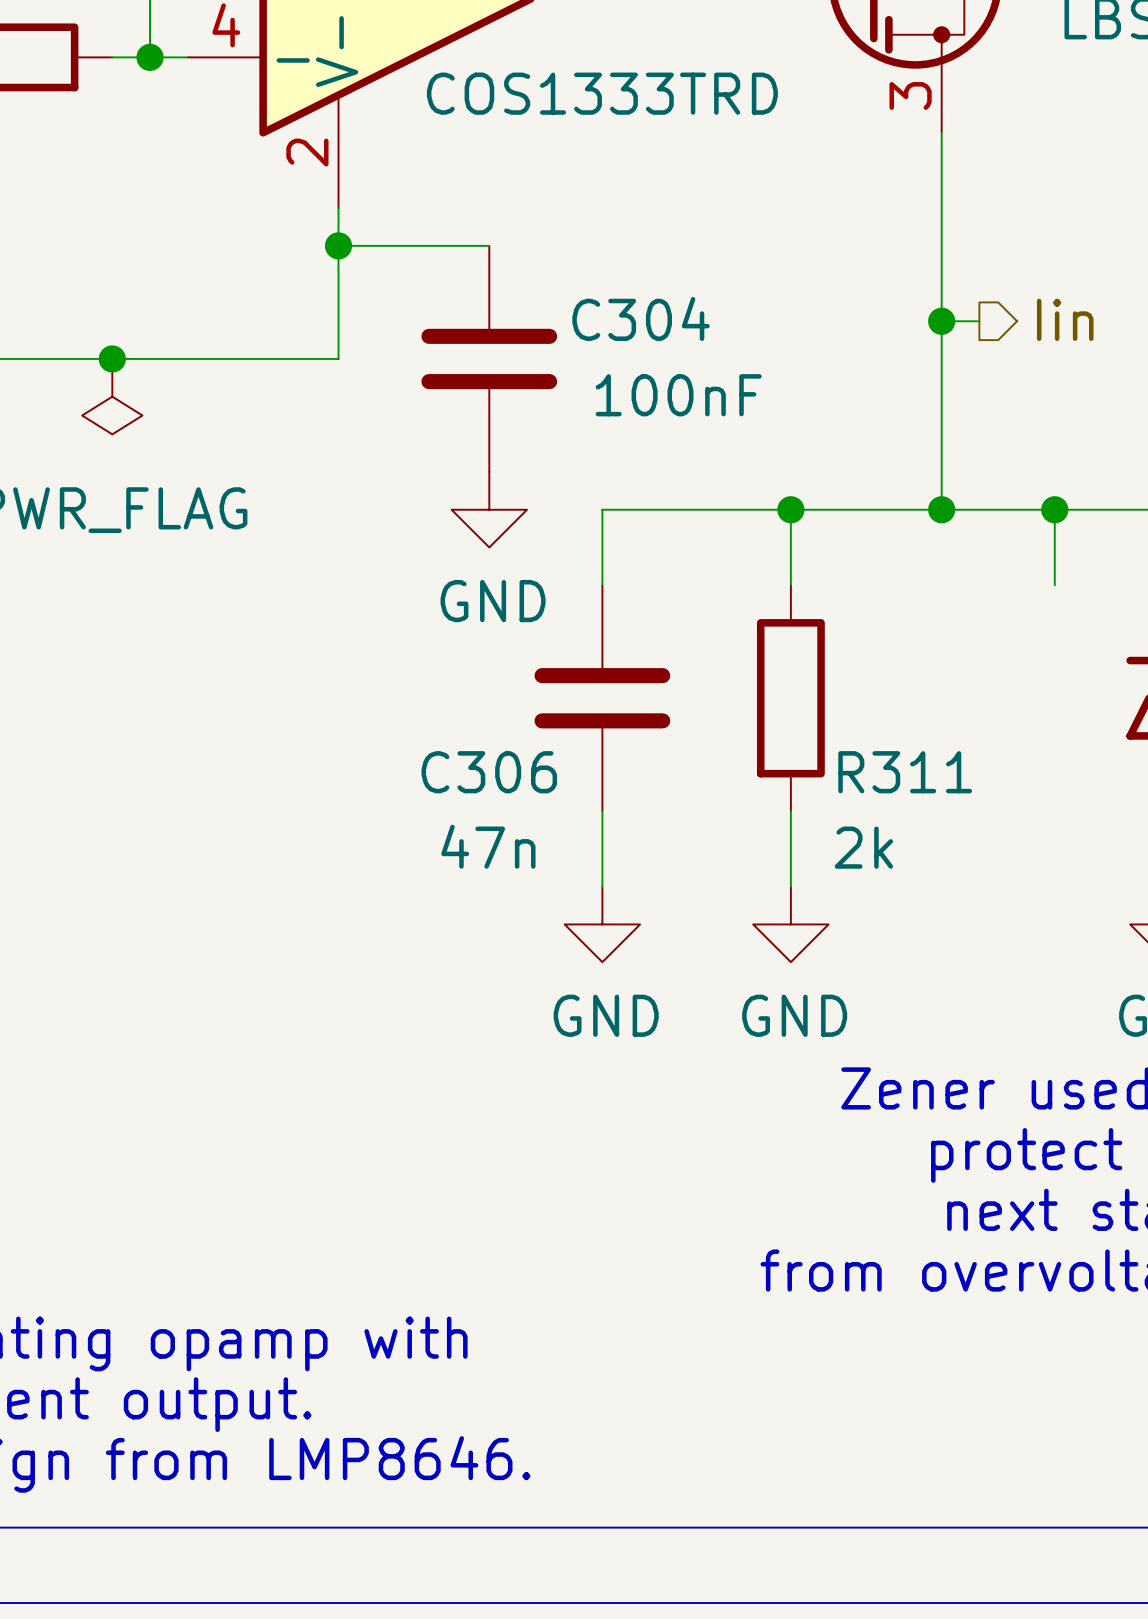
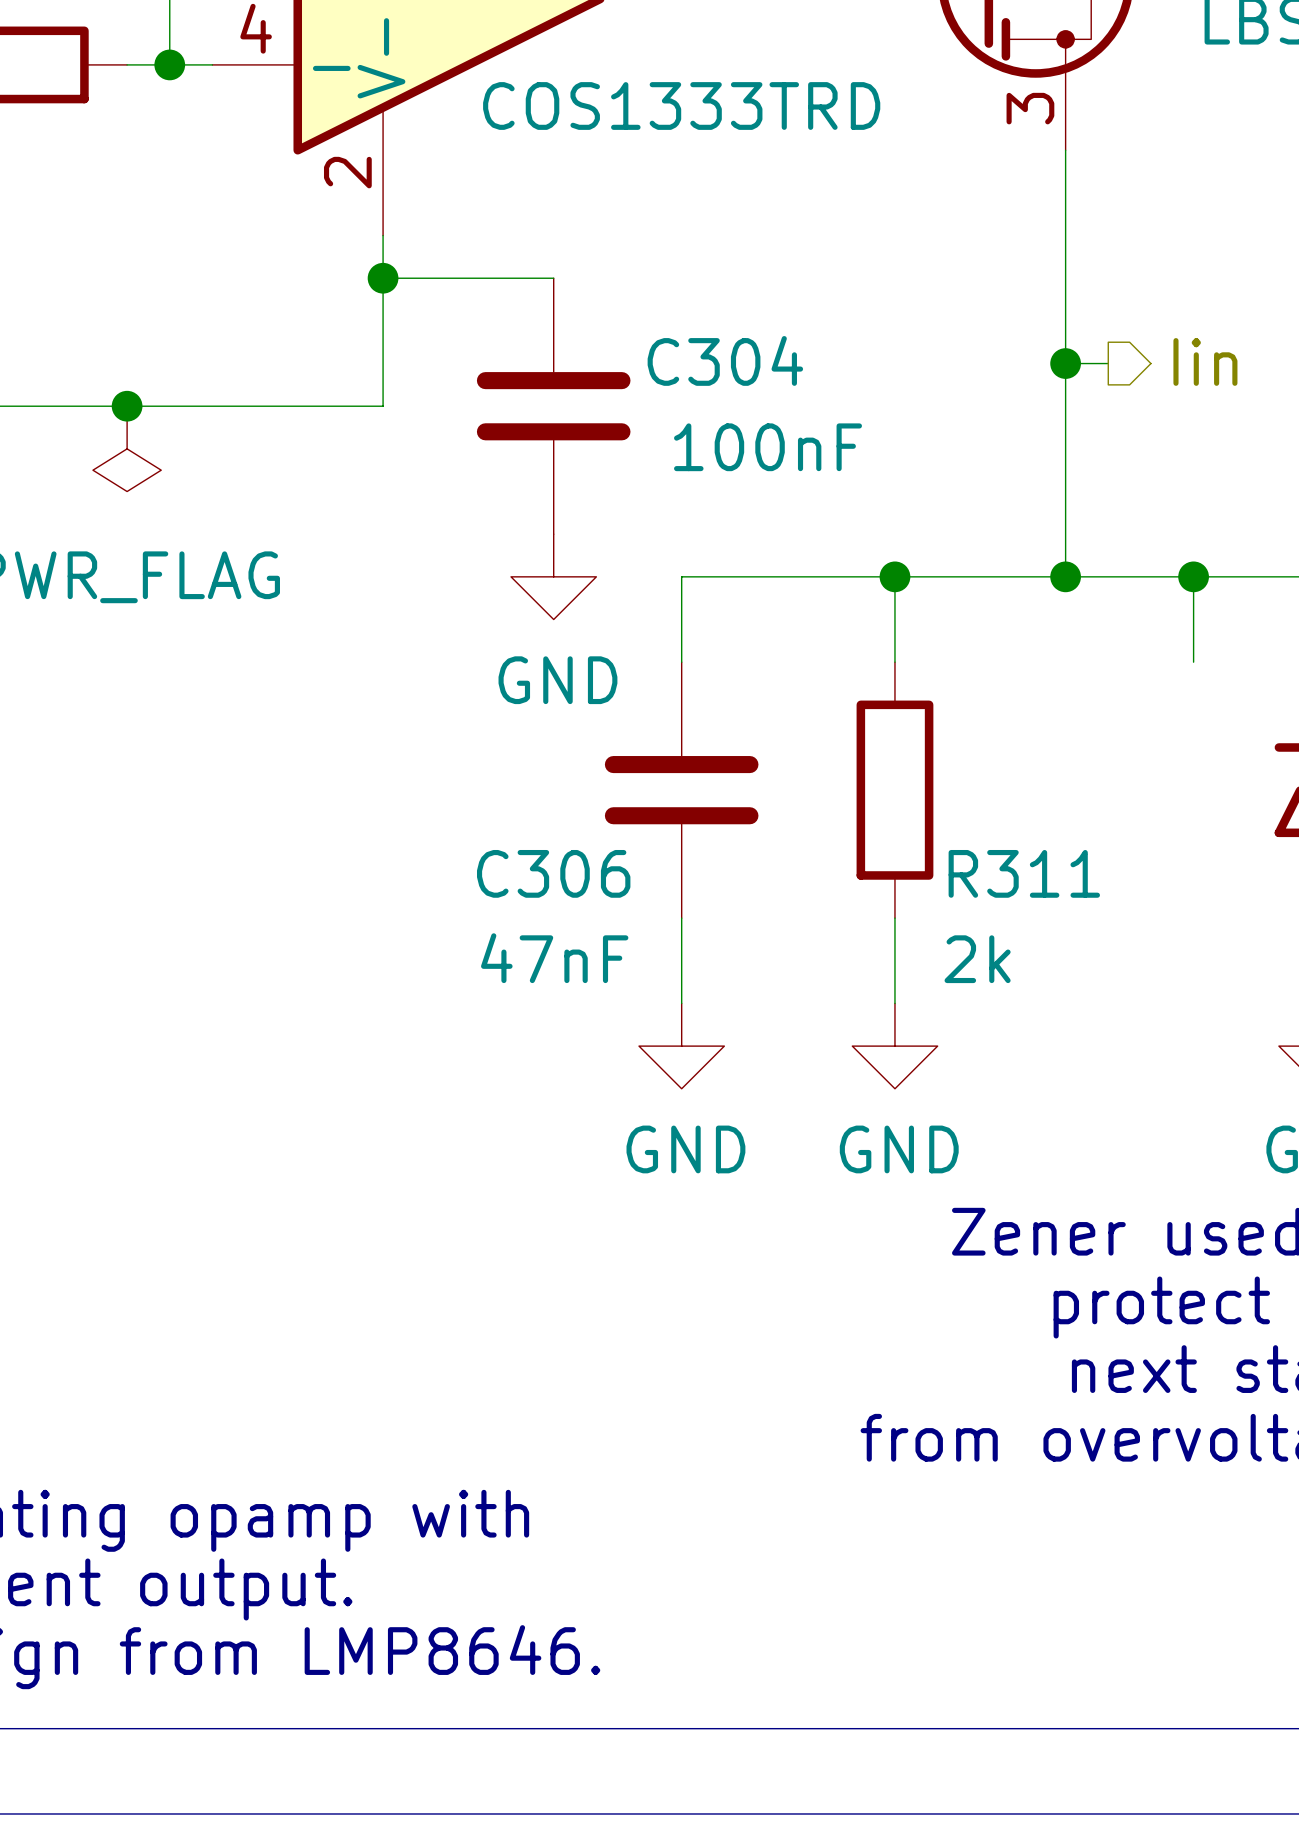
C306 value: 47n (488, 846) -> 47nF (554, 958)

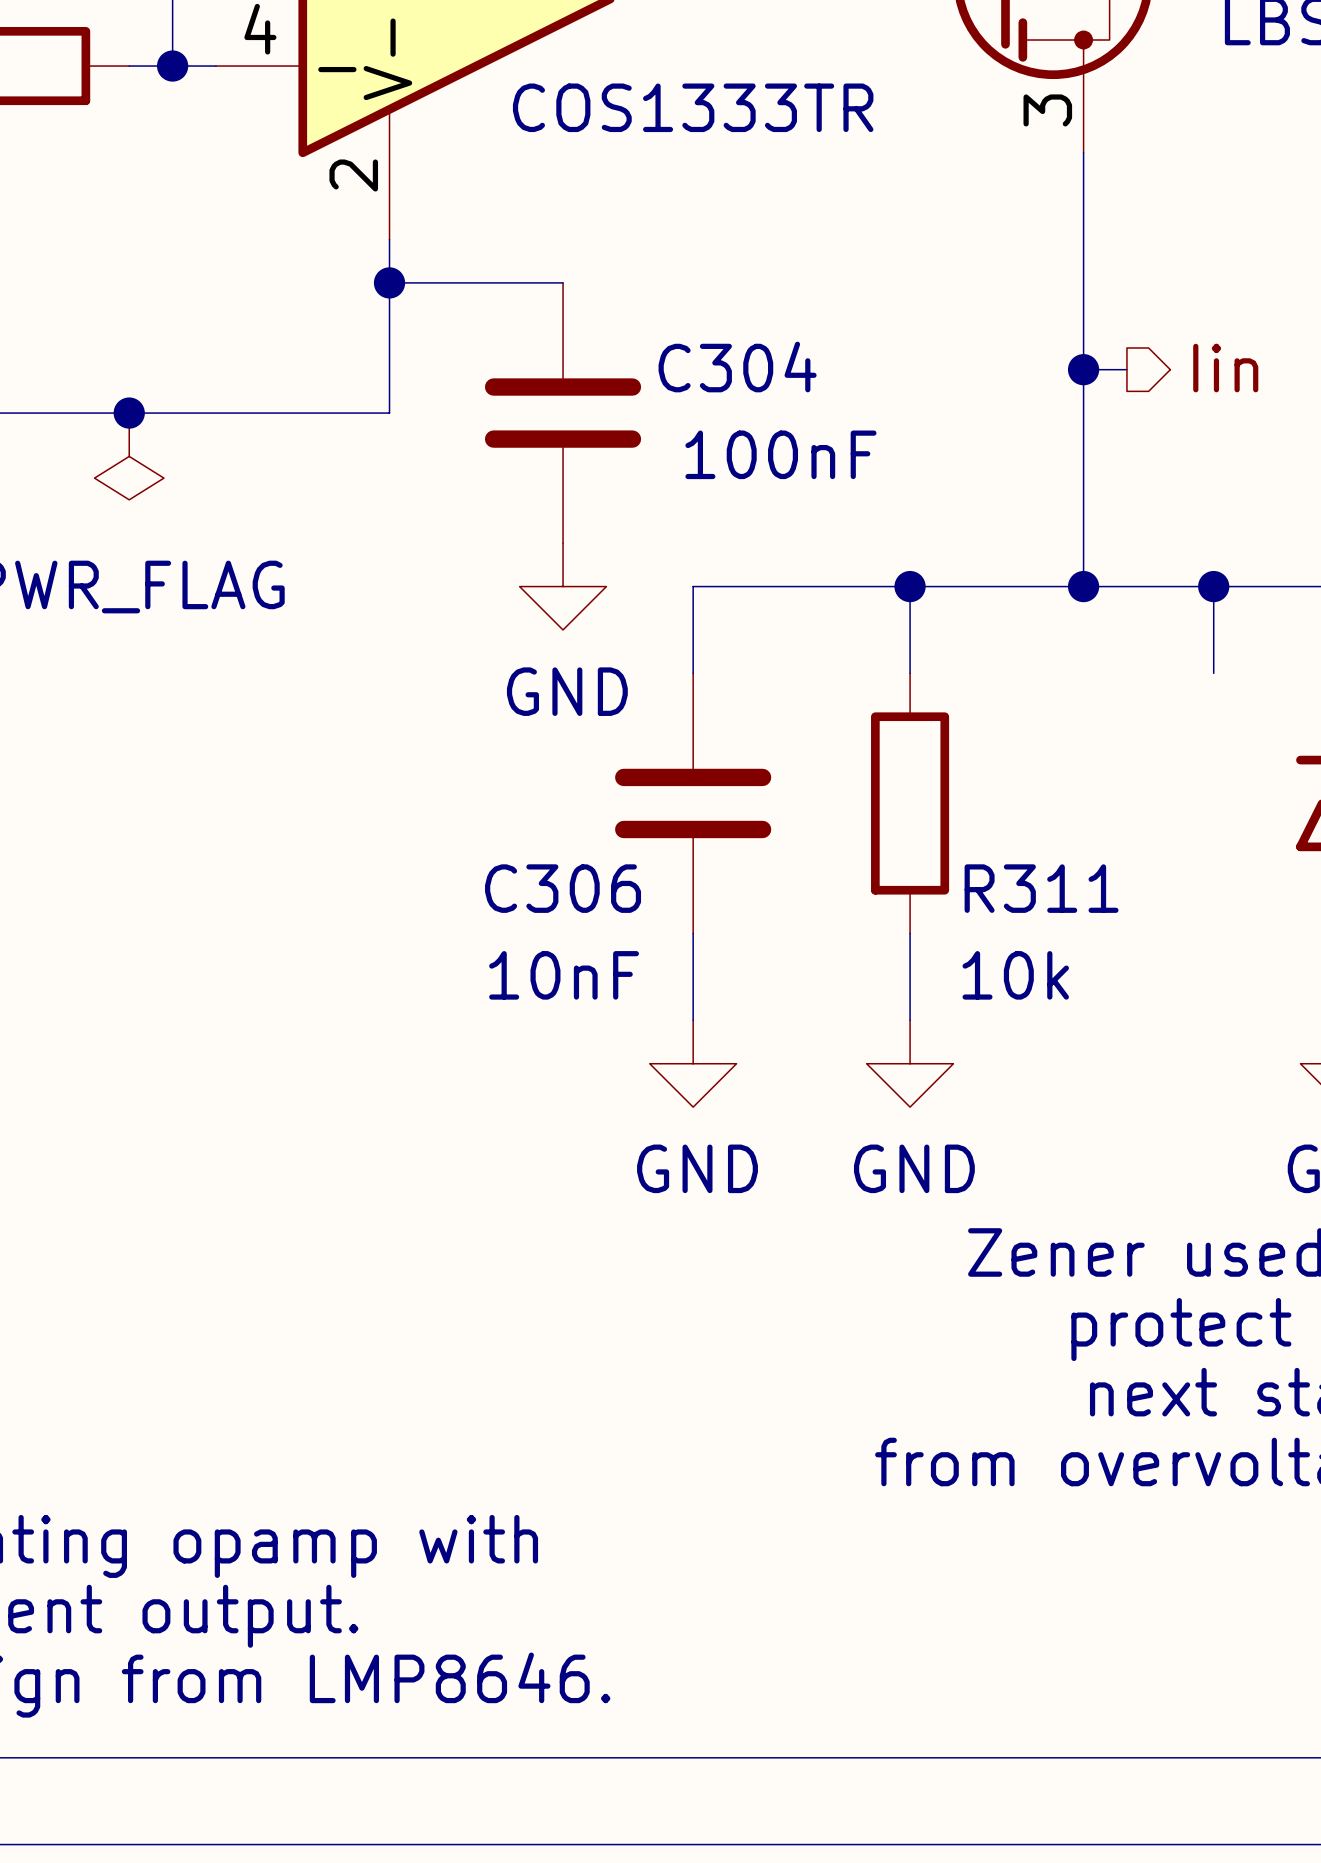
part value: COS1333TRD (681, 105) -> COS1333TR (693, 107)
C306 value: 47nF (554, 958) -> 10nF (564, 975)
R311 value: 2k (977, 959) -> 10k (1015, 975)

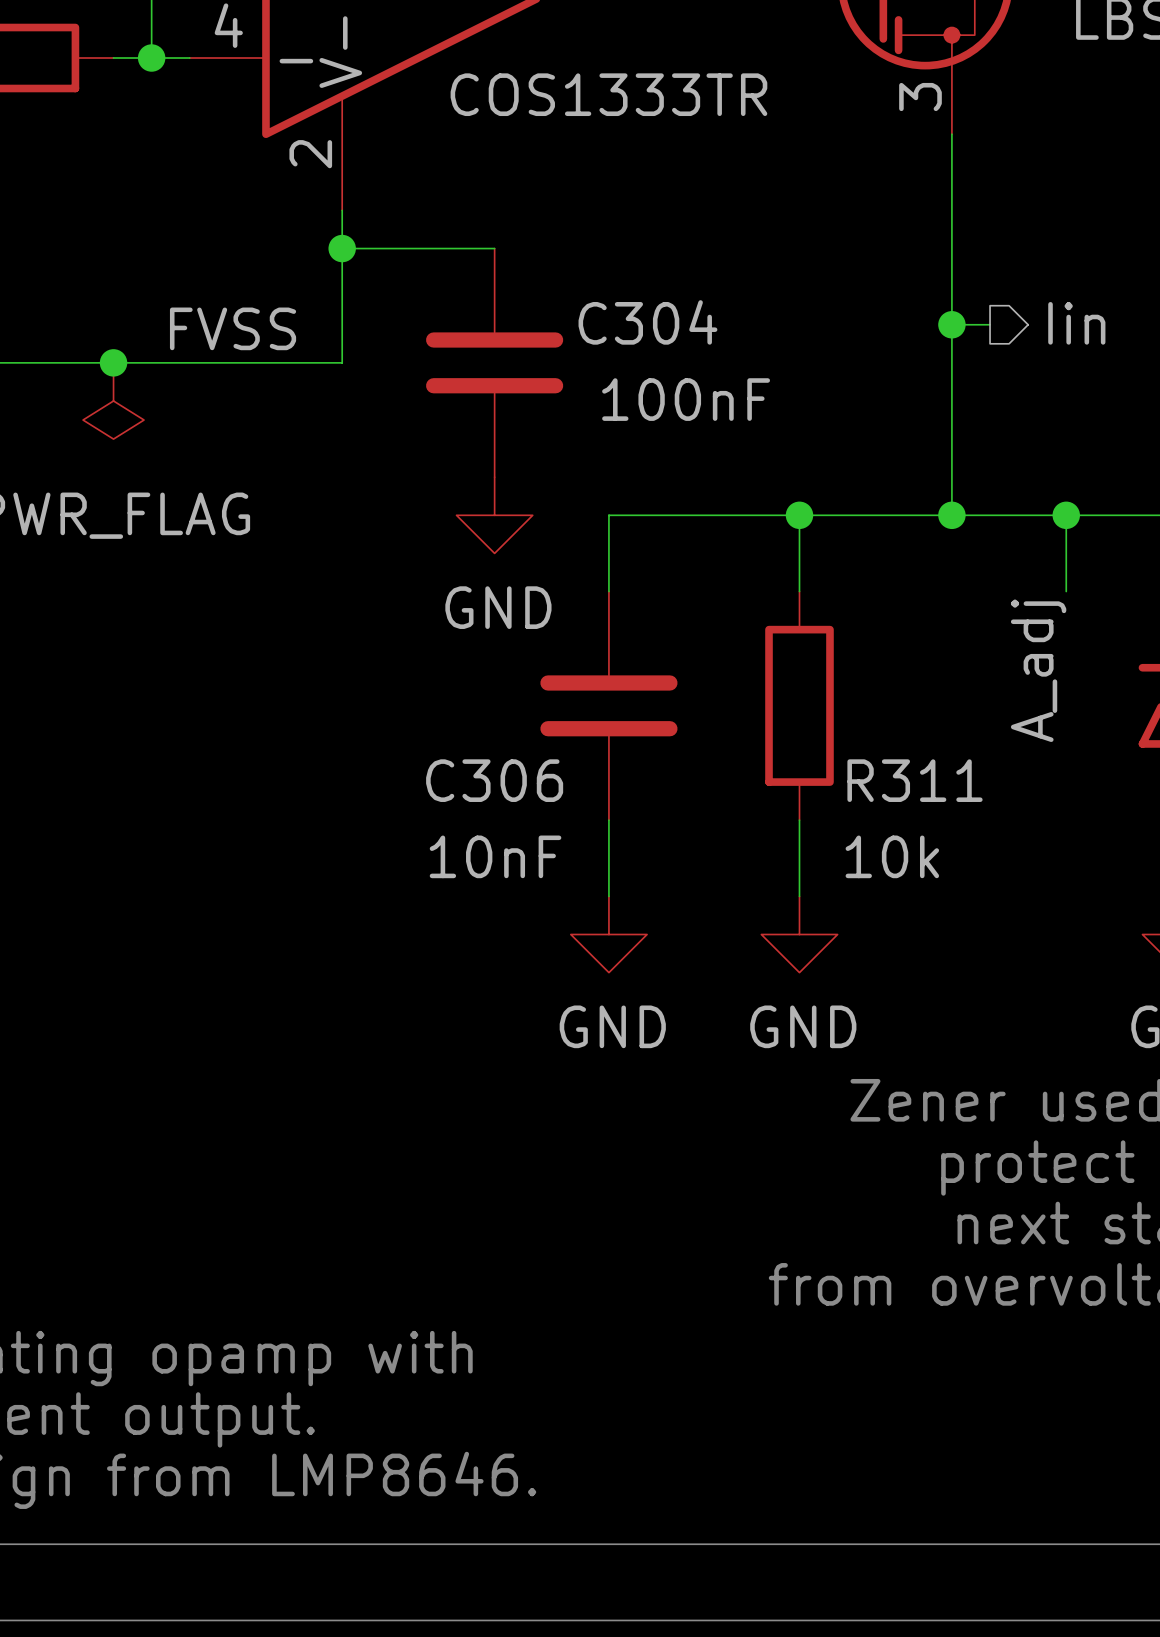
label: none -> FVSS (233, 328)
label: none -> A_adj (1038, 670)

